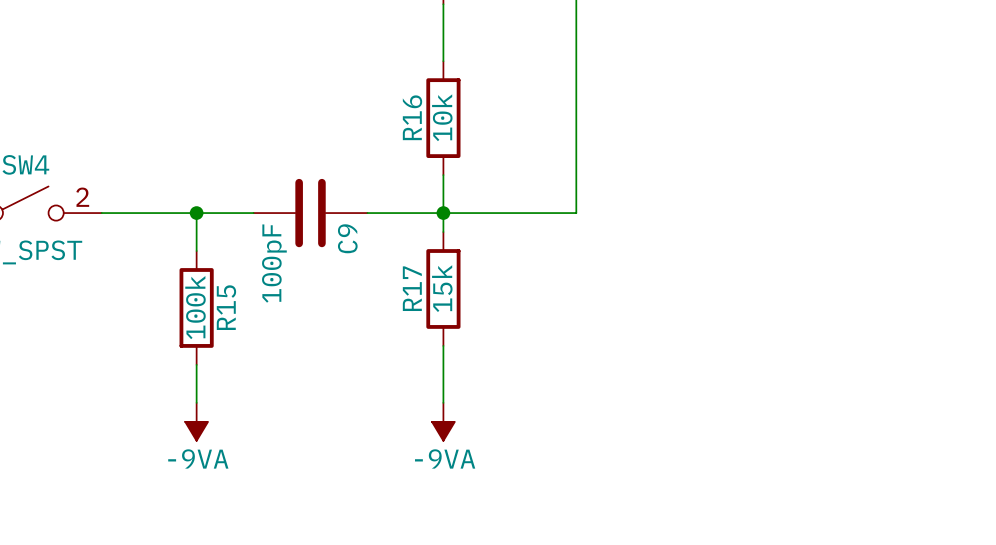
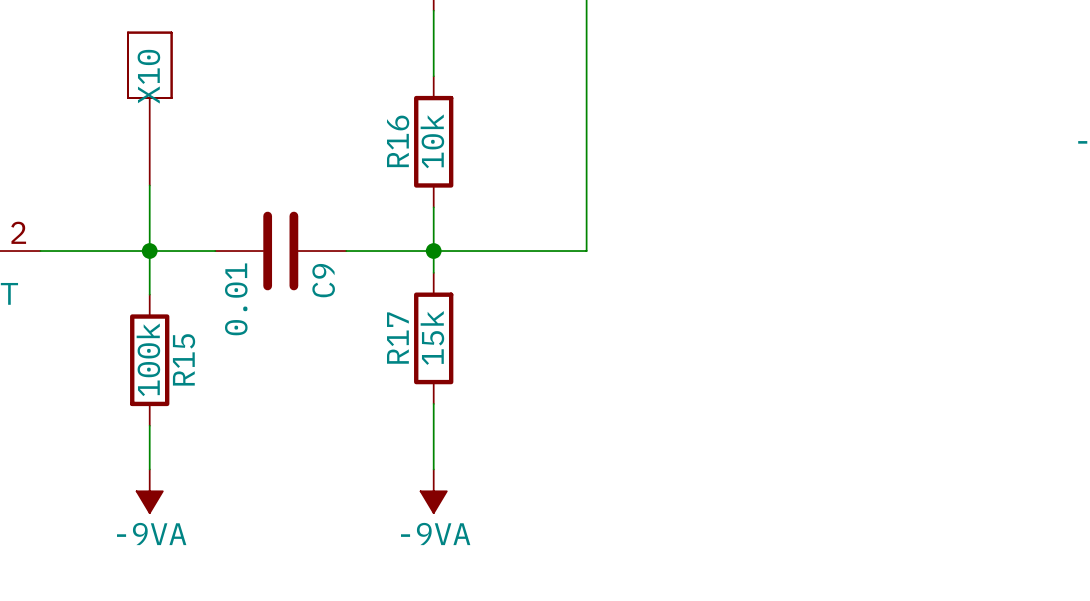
X10: none -> (149, 109)
wire: none -> (149, 185) (149, 251)
C9 value: 100pF (274, 263) -> 0.01 (236, 299)

